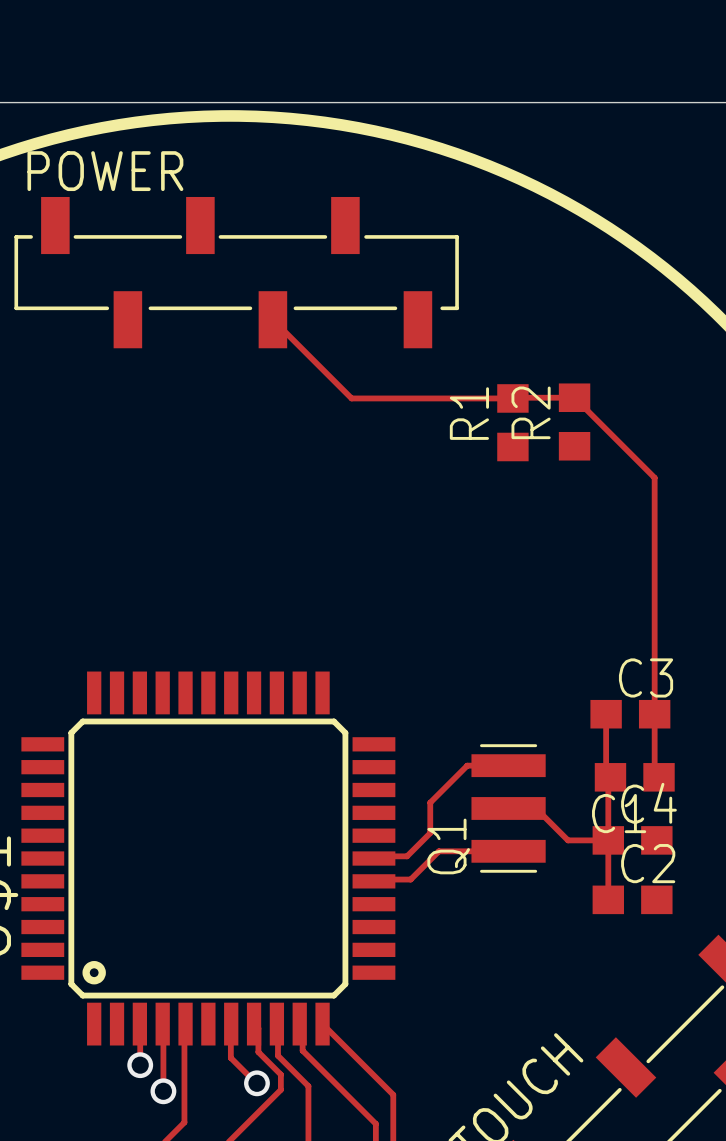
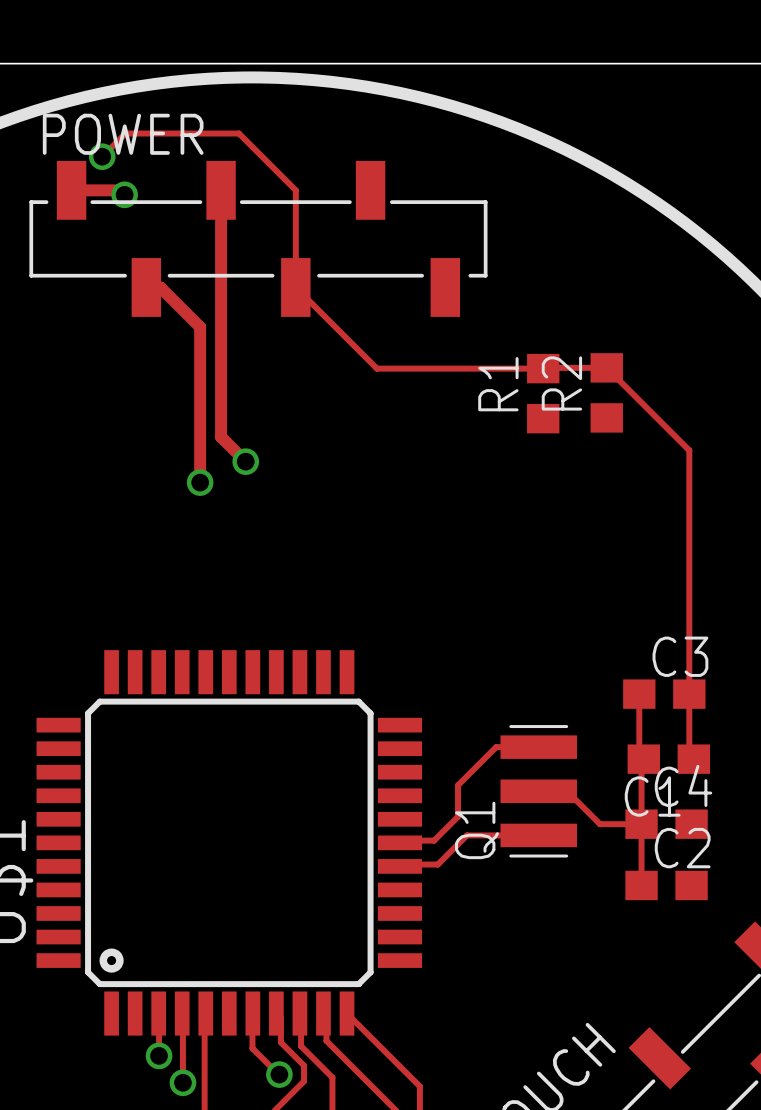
track: none -> (102, 156) (125, 133) (239, 133) (295, 190) (295, 287)
via: none -> (102, 156)
track: none -> (71, 190) (120, 190) (124, 194)
track: none -> (221, 190) (221, 436) (245, 461)
via: none -> (124, 194)
track: none -> (146, 287) (160, 287) (200, 327) (200, 482)
via: none -> (245, 461)
via: none -> (200, 482)

